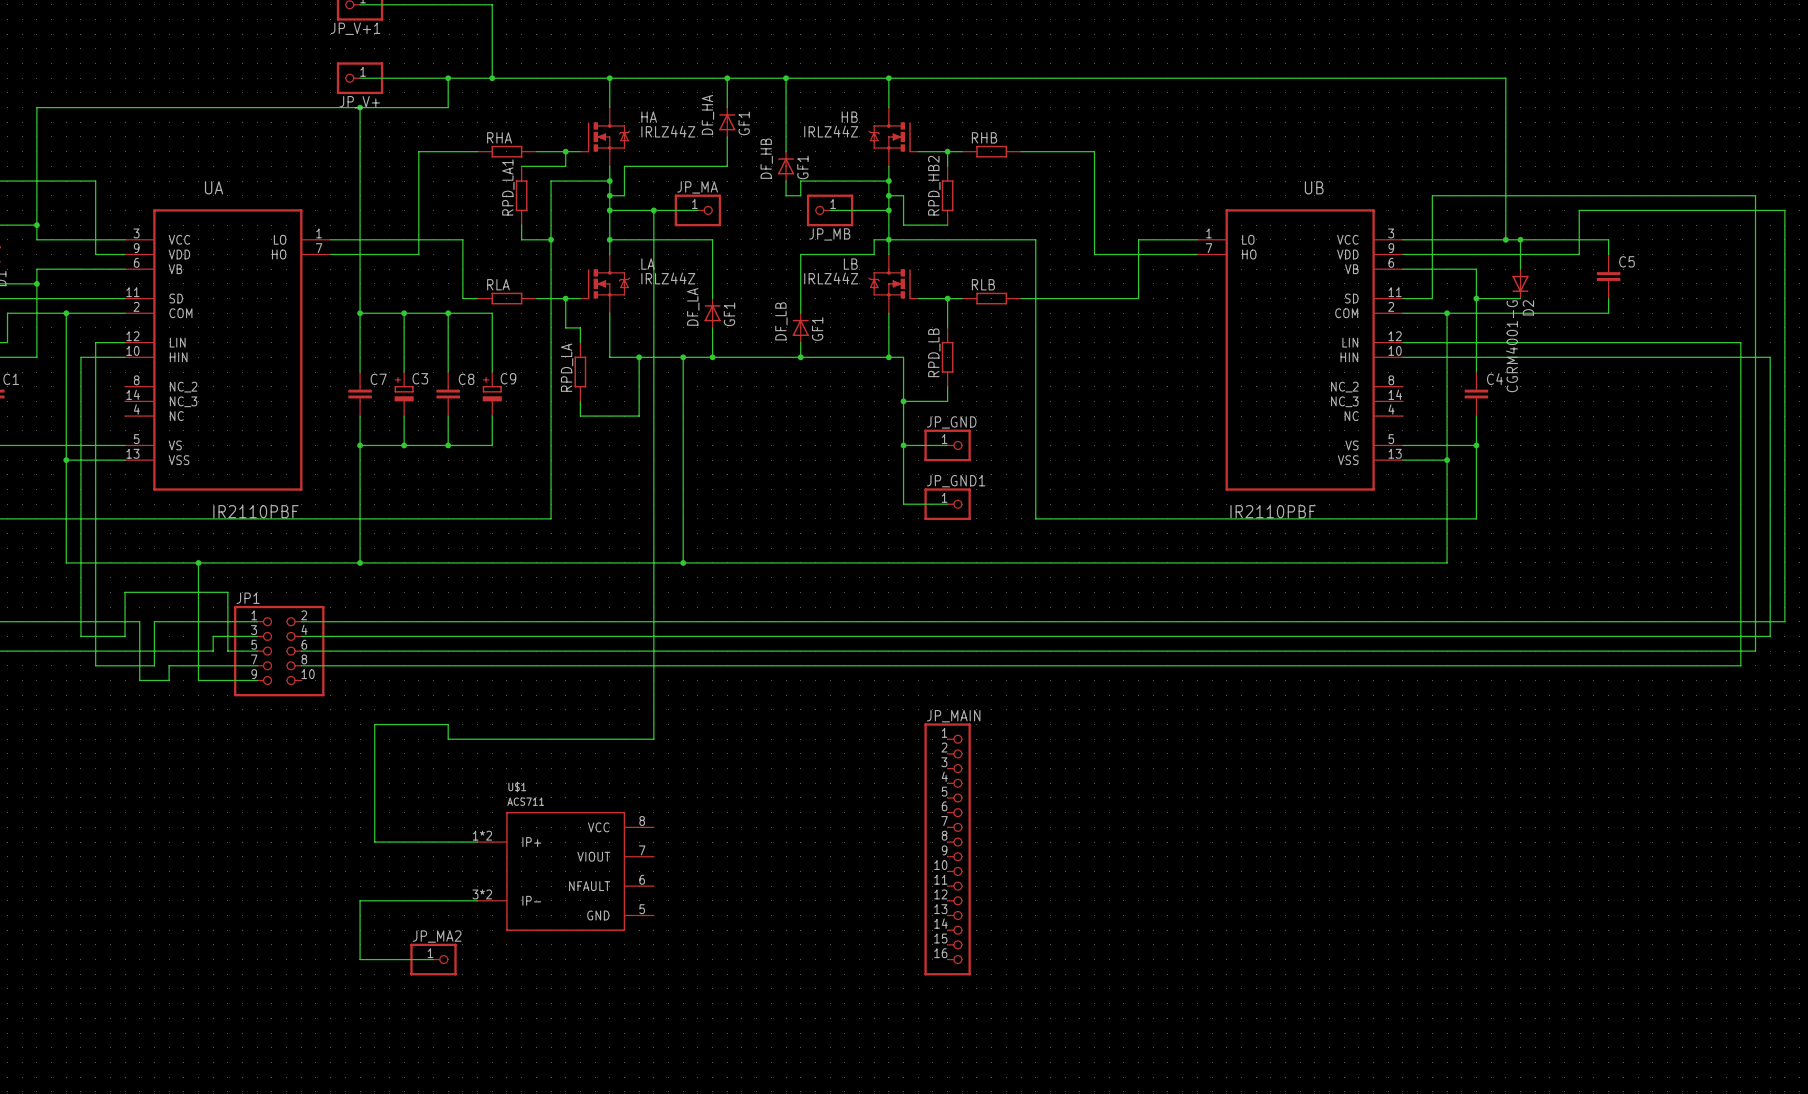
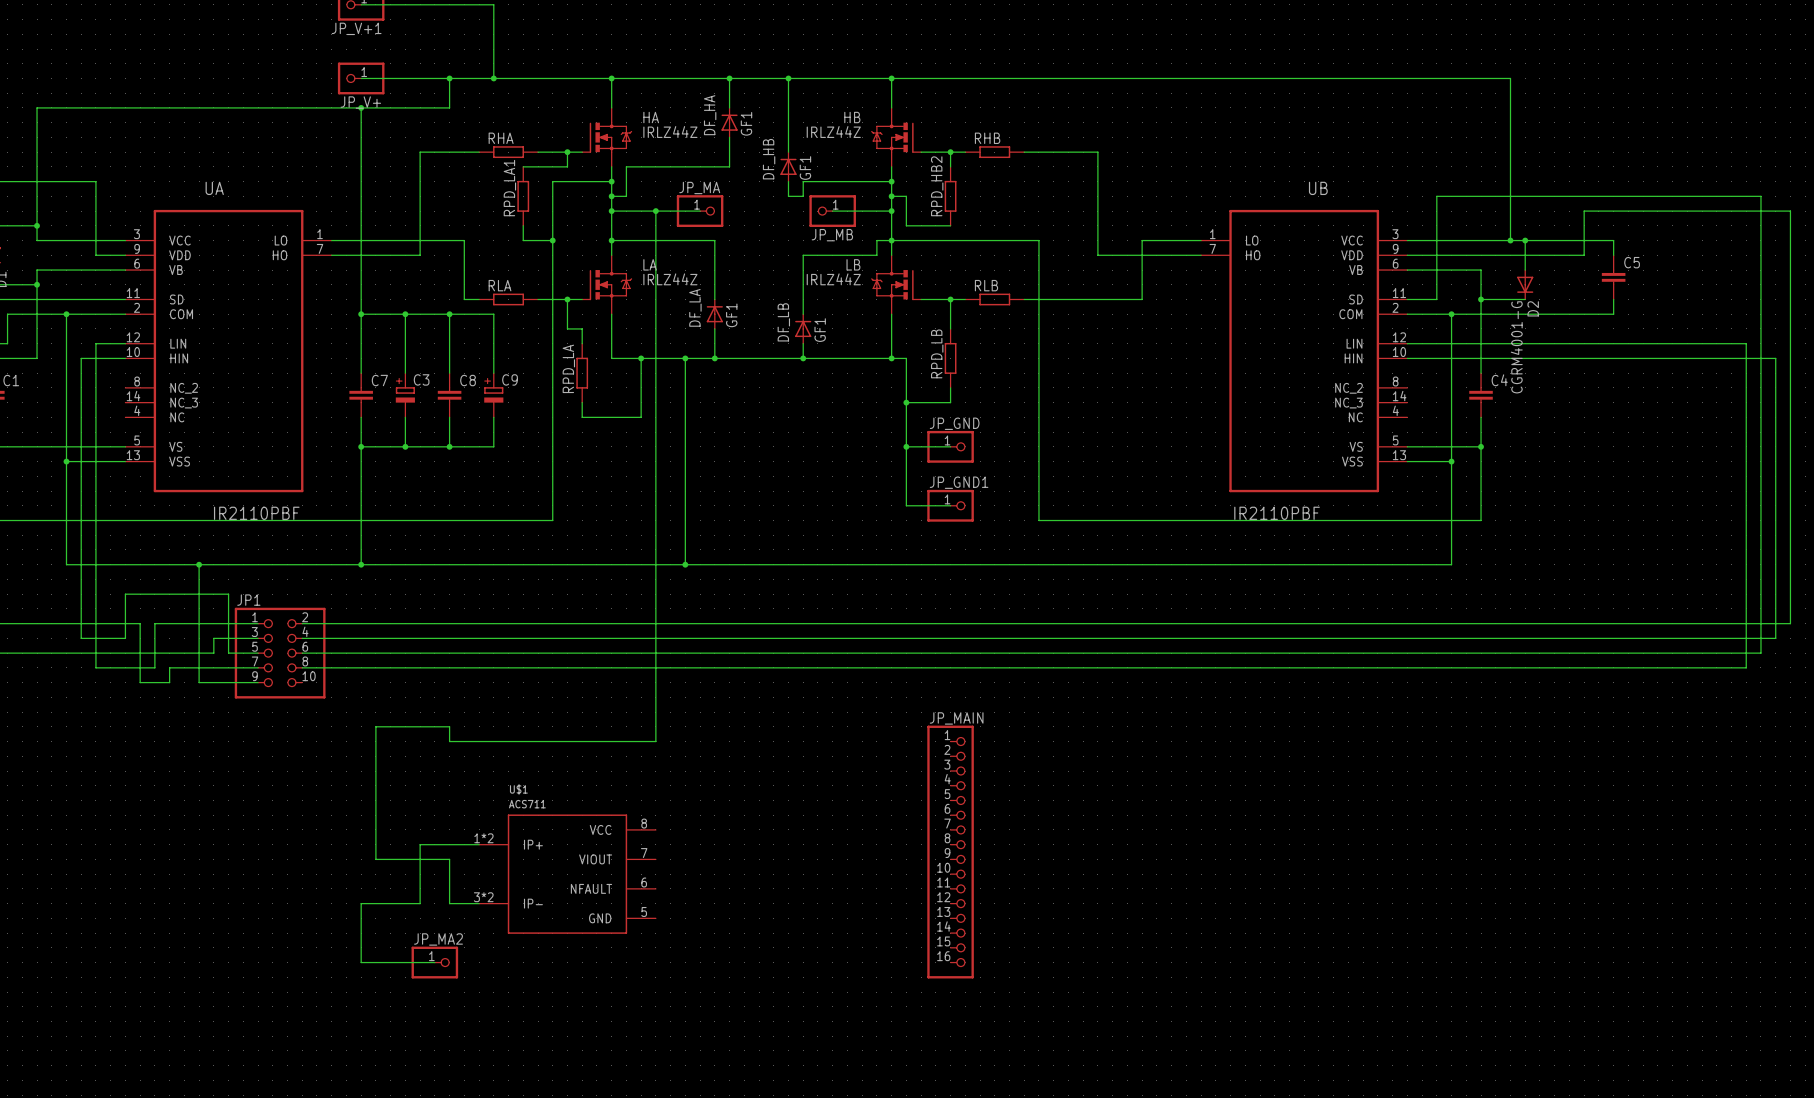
wire: (374, 842) (418, 842) -> (375, 844) (375, 859) (449, 859) (449, 903)
wire: (418, 900) (448, 900) -> (420, 903) (420, 844)

